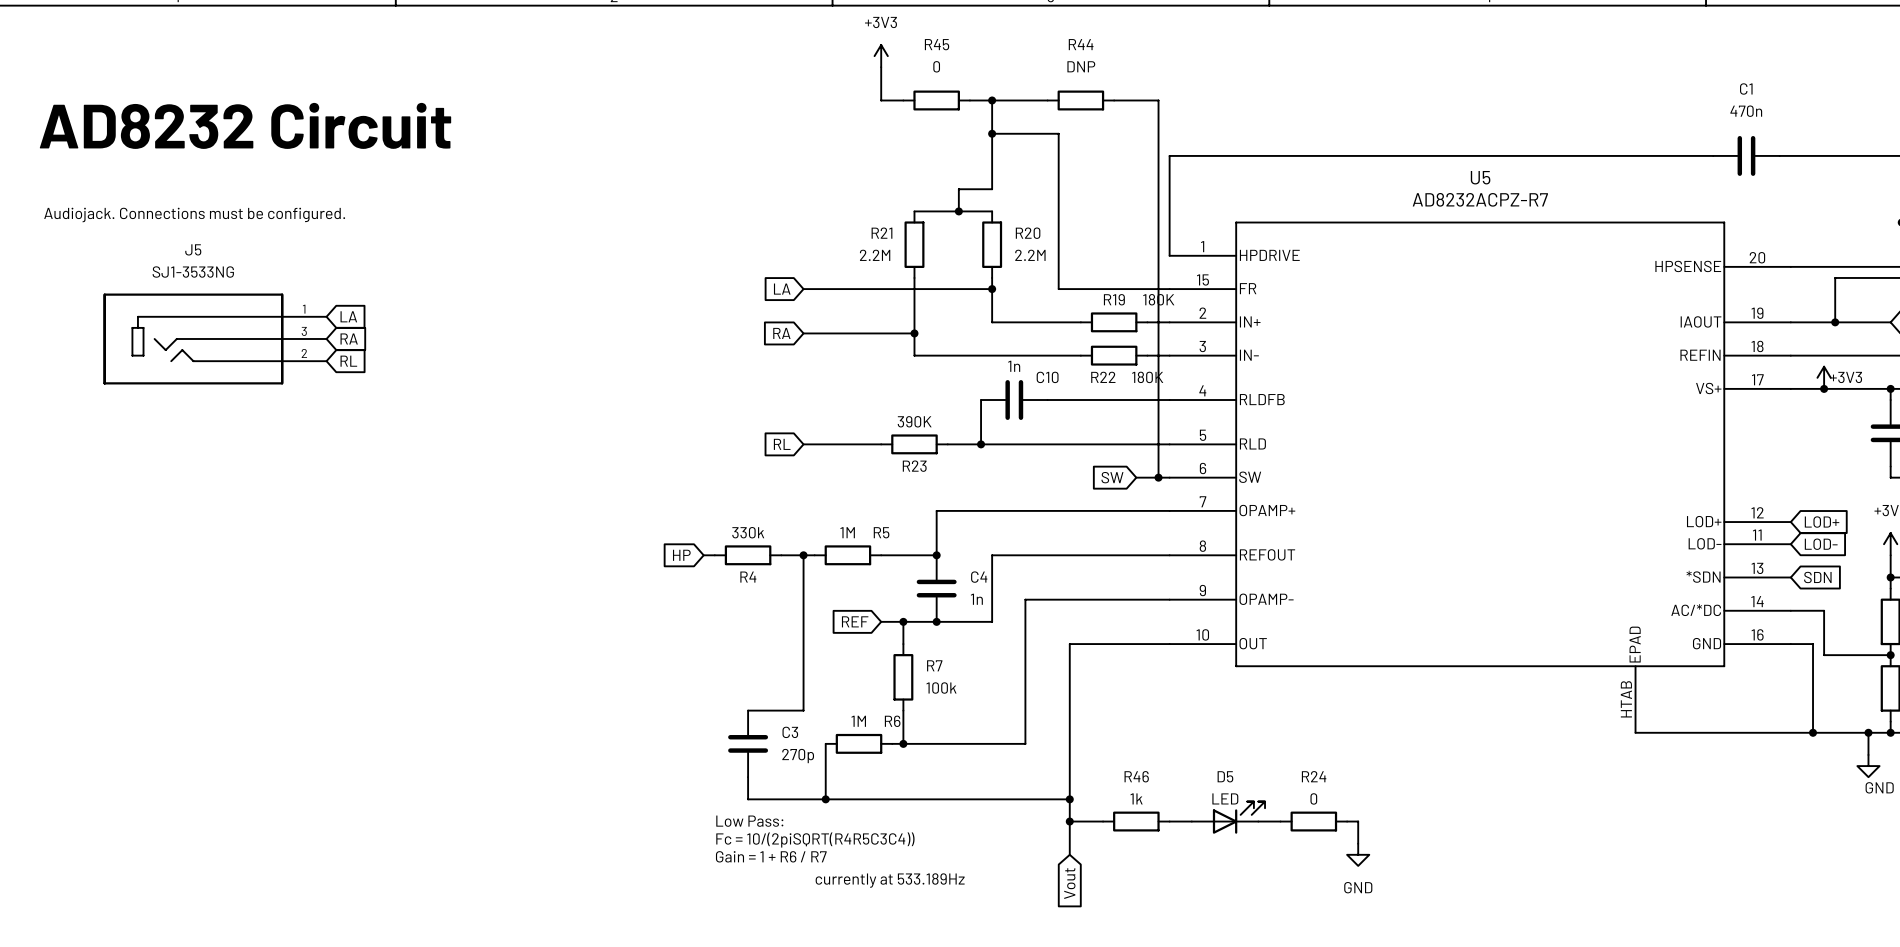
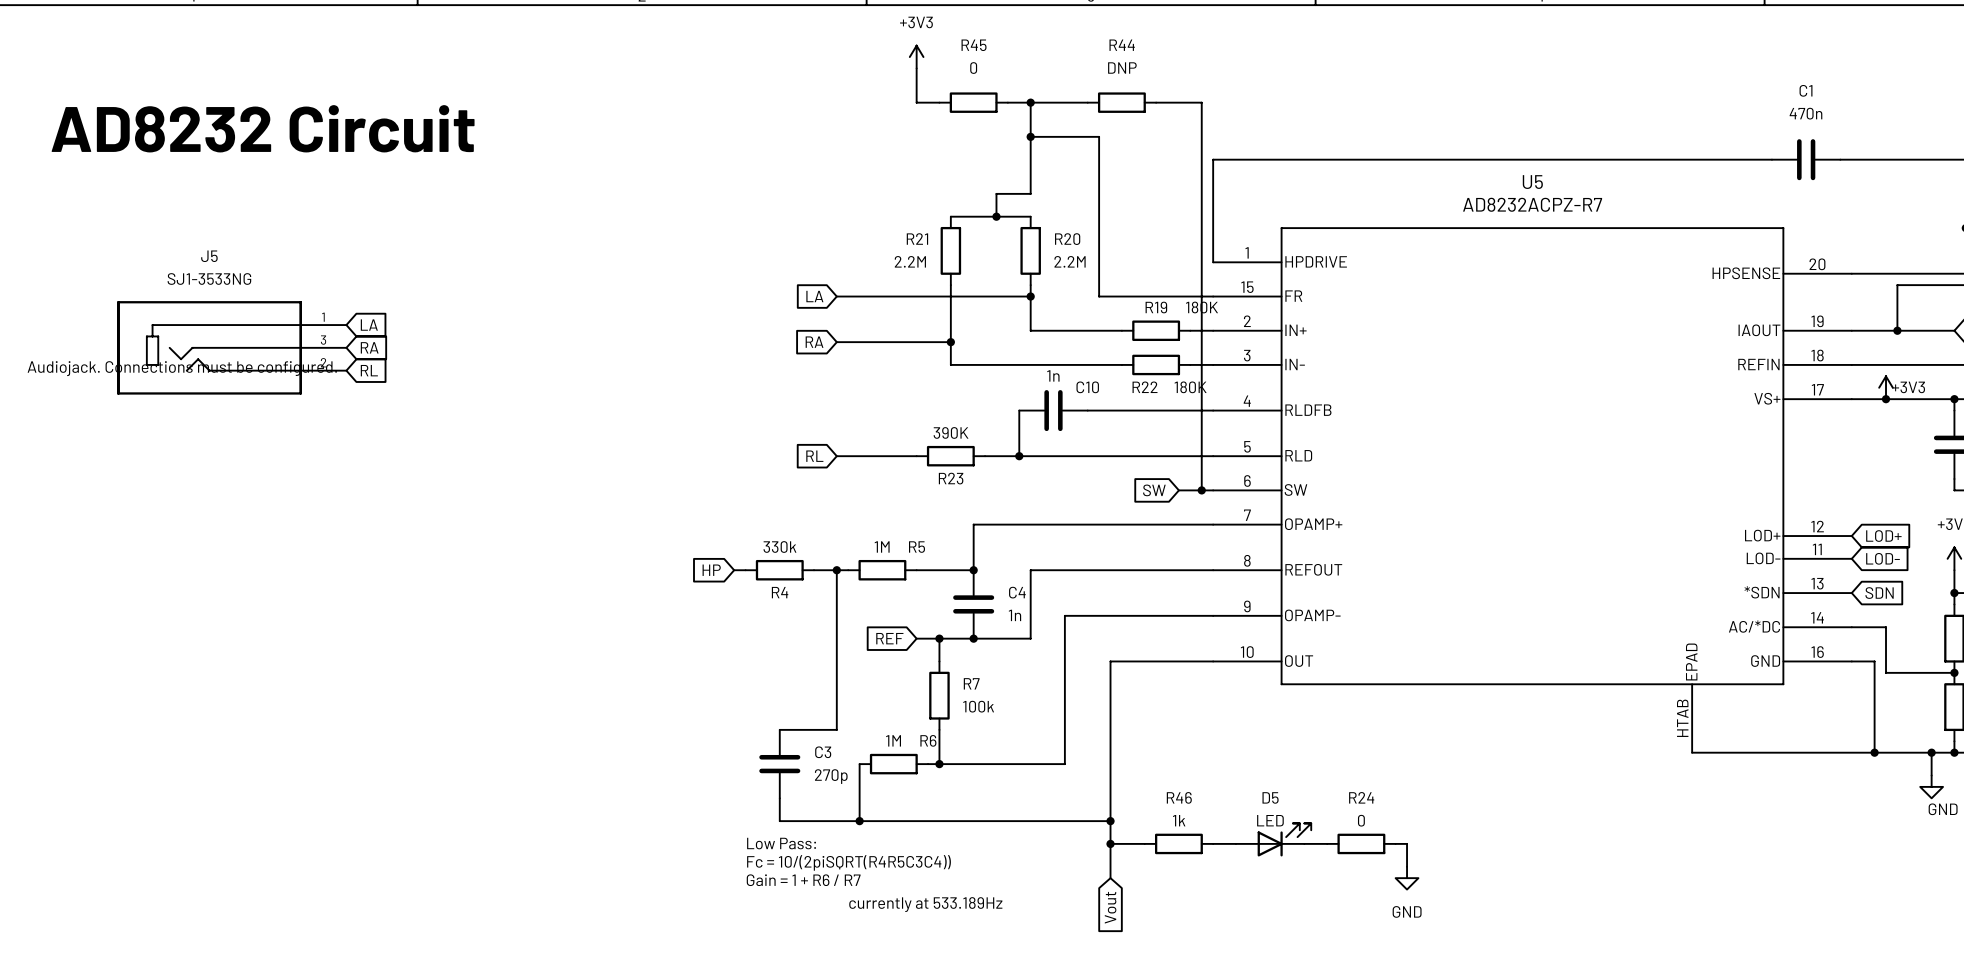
text position: Audiojack. Connections must be configured. (194, 215) -> Audiojack. Connections must be configured. (182, 368)

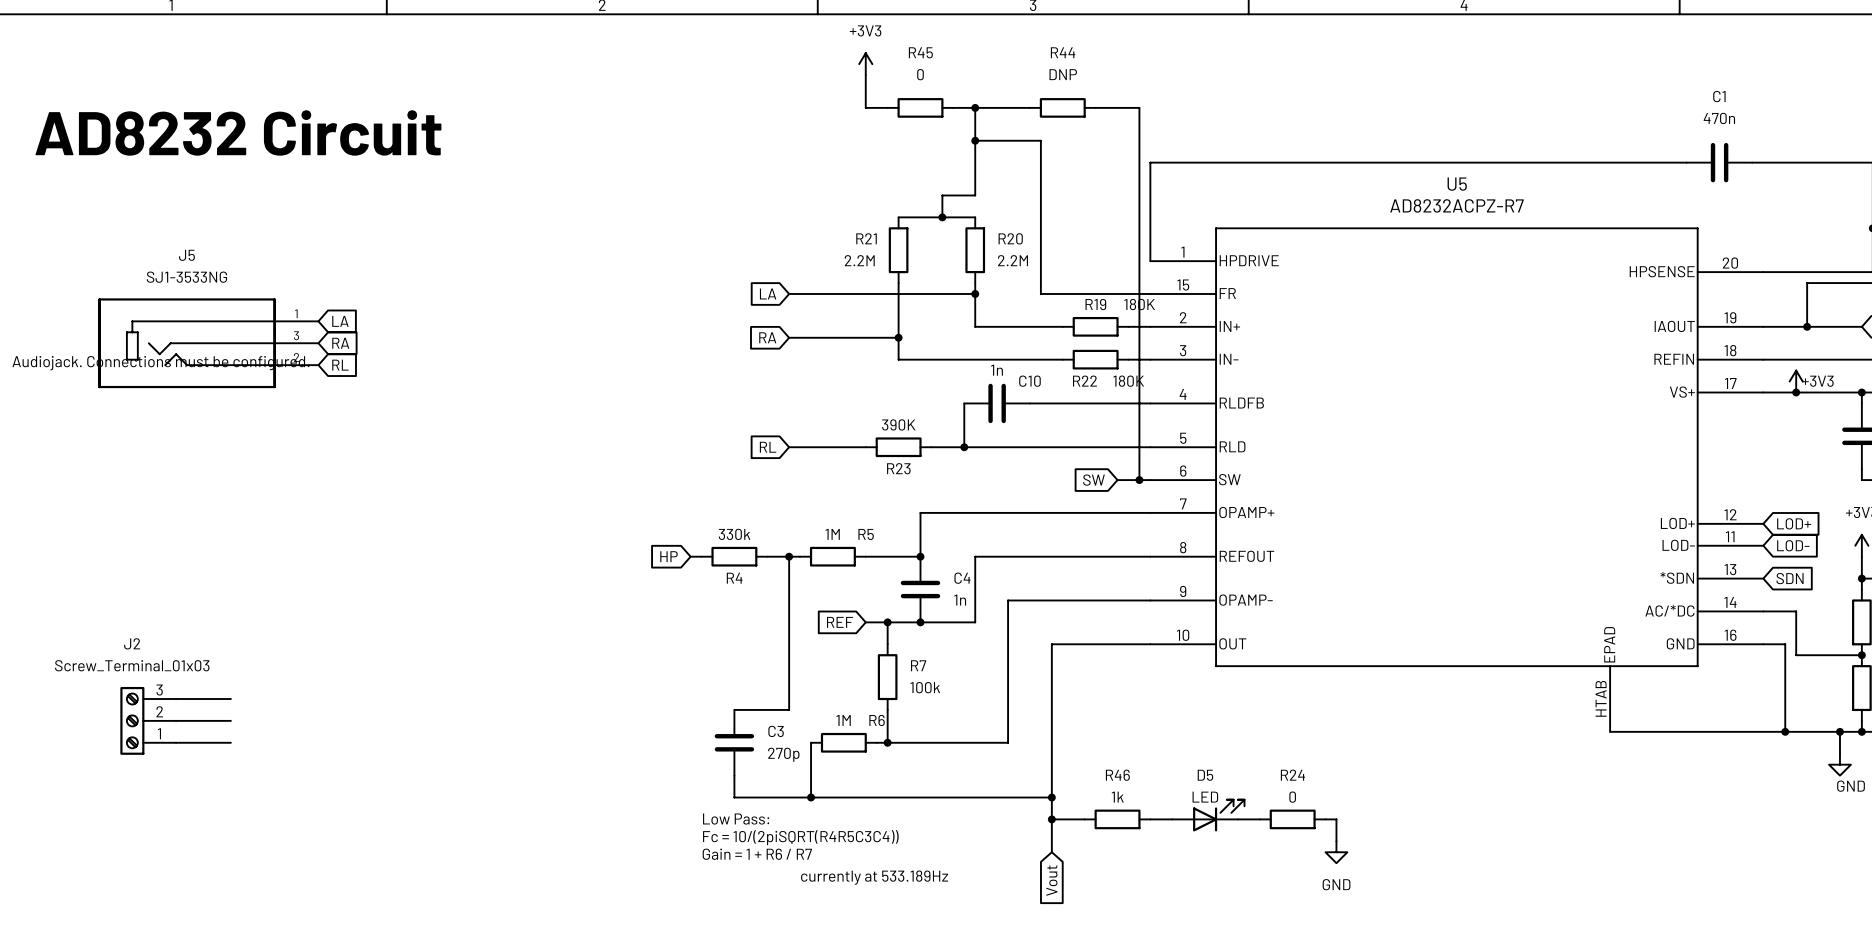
wire: none -> (176, 699) (230, 699)
J2: none -> Screw_Terminal_01x03 (148, 720)
wire: none -> (176, 720) (230, 720)
wire: none -> (176, 742) (230, 742)

